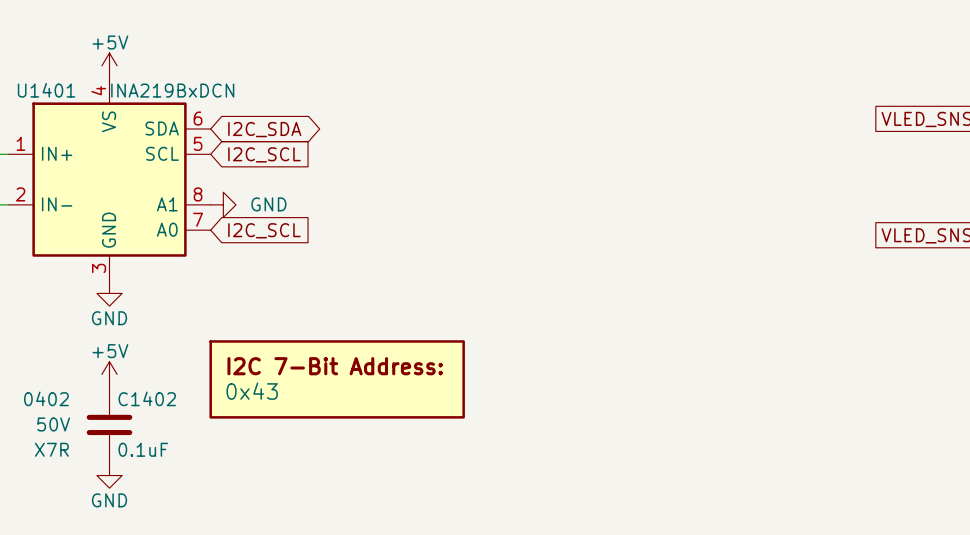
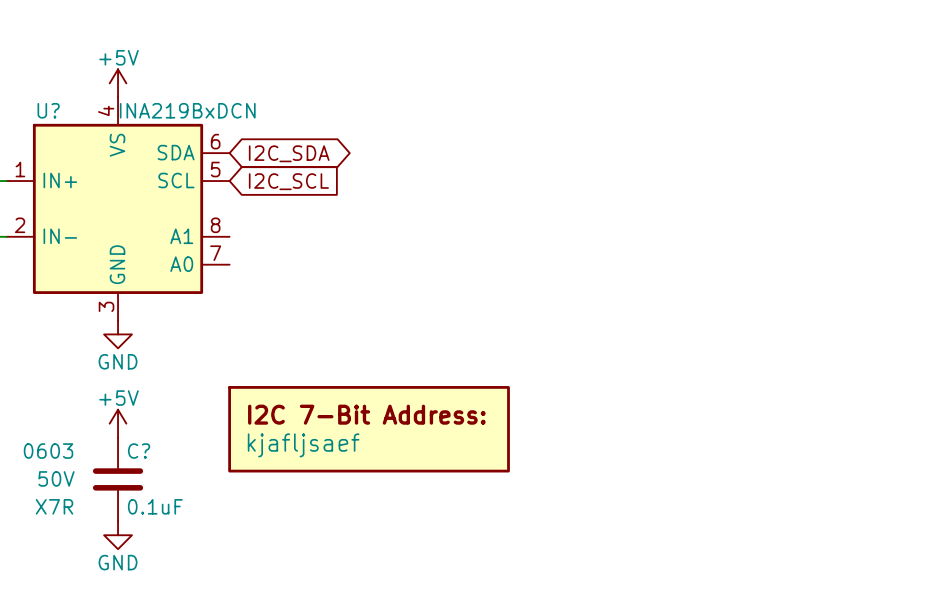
U1401 name: U1401 (46, 90) -> U? (48, 110)
power symbol: GND (223, 204) -> none
global label: I2C_SCL (264, 230) -> none
part value: 0x43 (252, 391) -> kjafljsaef (303, 445)
C1402 text: 0402 (46, 398) -> 0603 (48, 451)
C1402 name: C1402 (147, 398) -> C? (139, 451)

